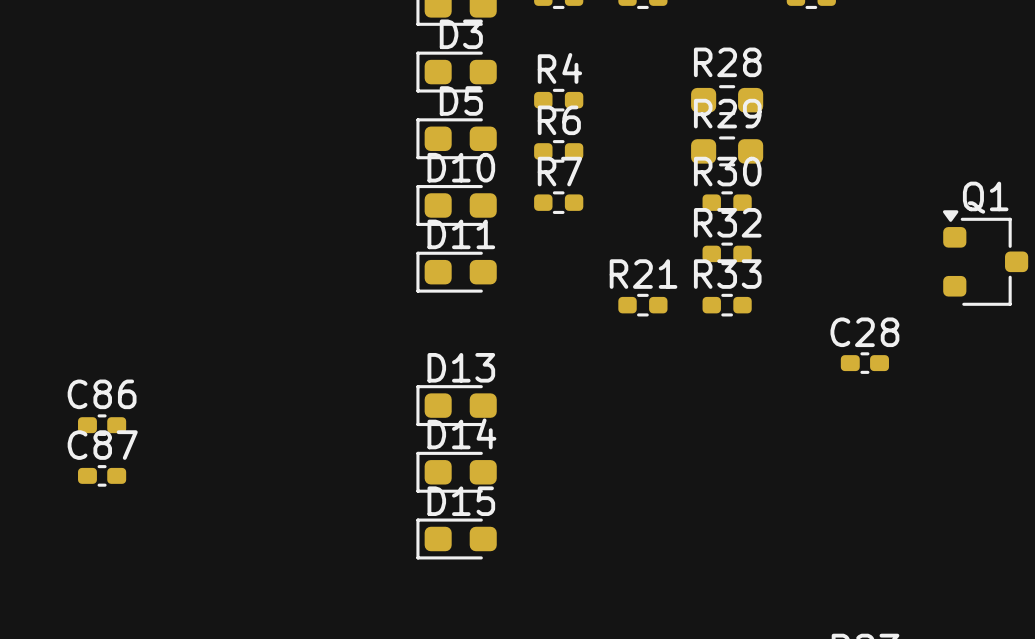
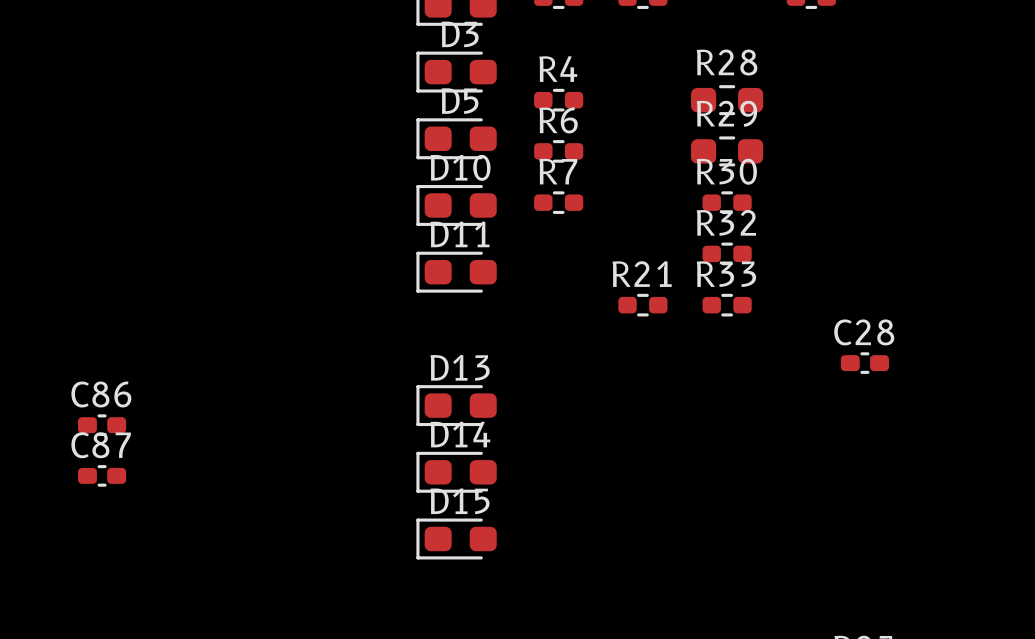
Q1: (985, 258) -> none

